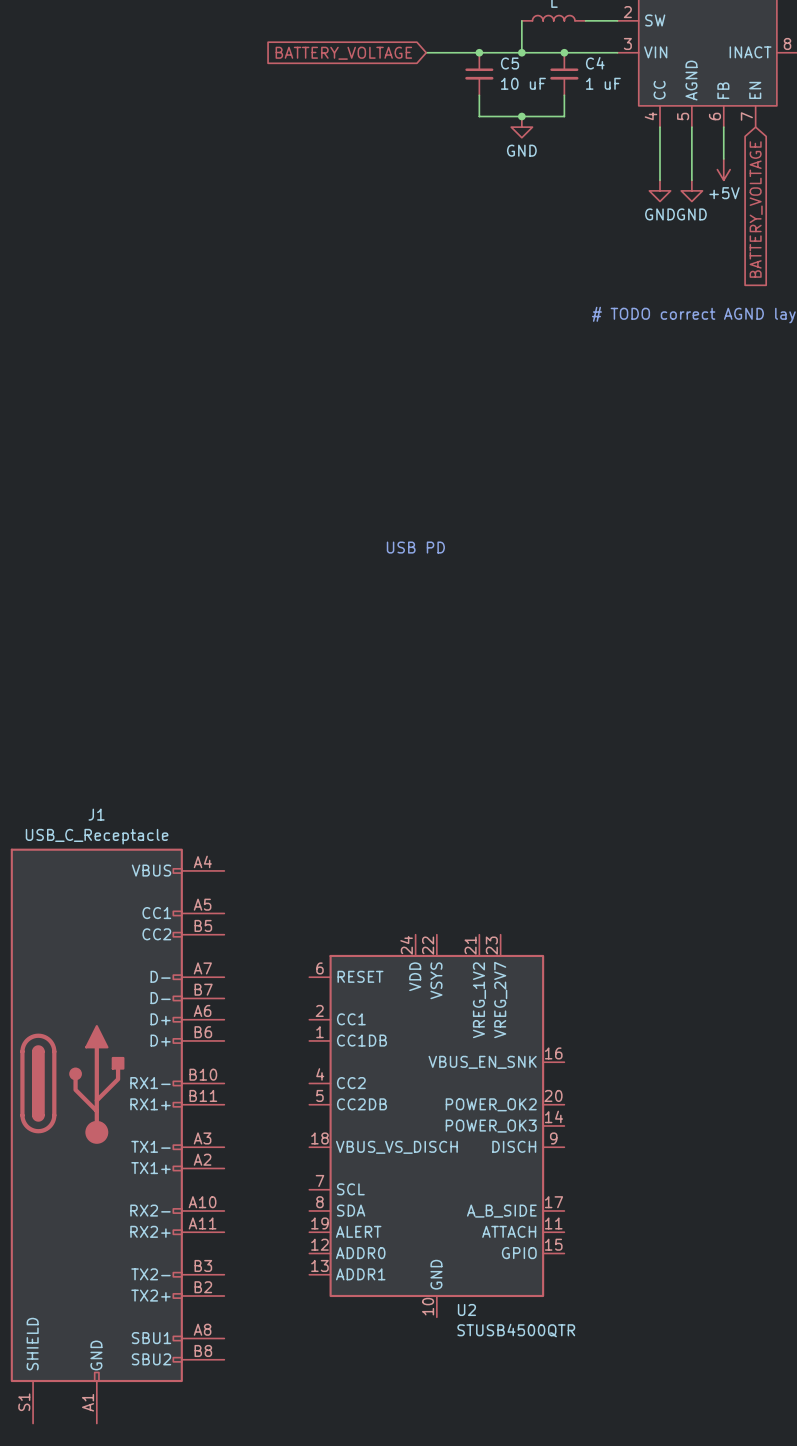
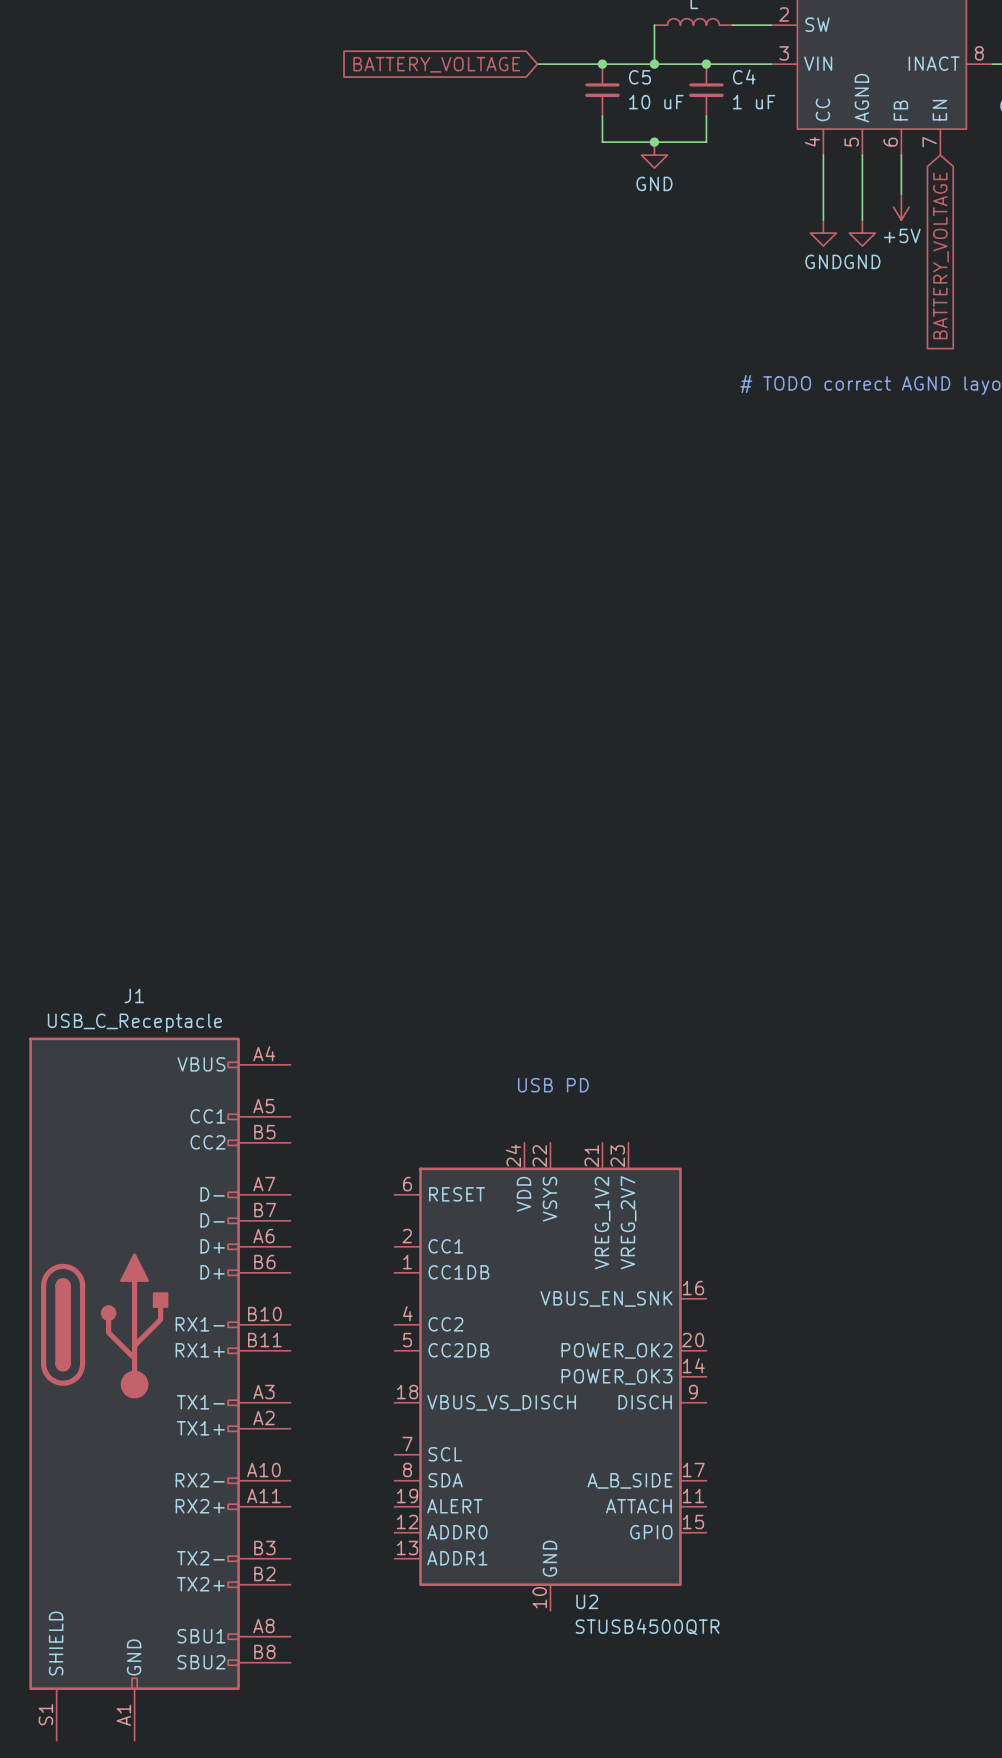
text: USB PD (415, 547) -> none
text: none -> USB PD (553, 1085)

